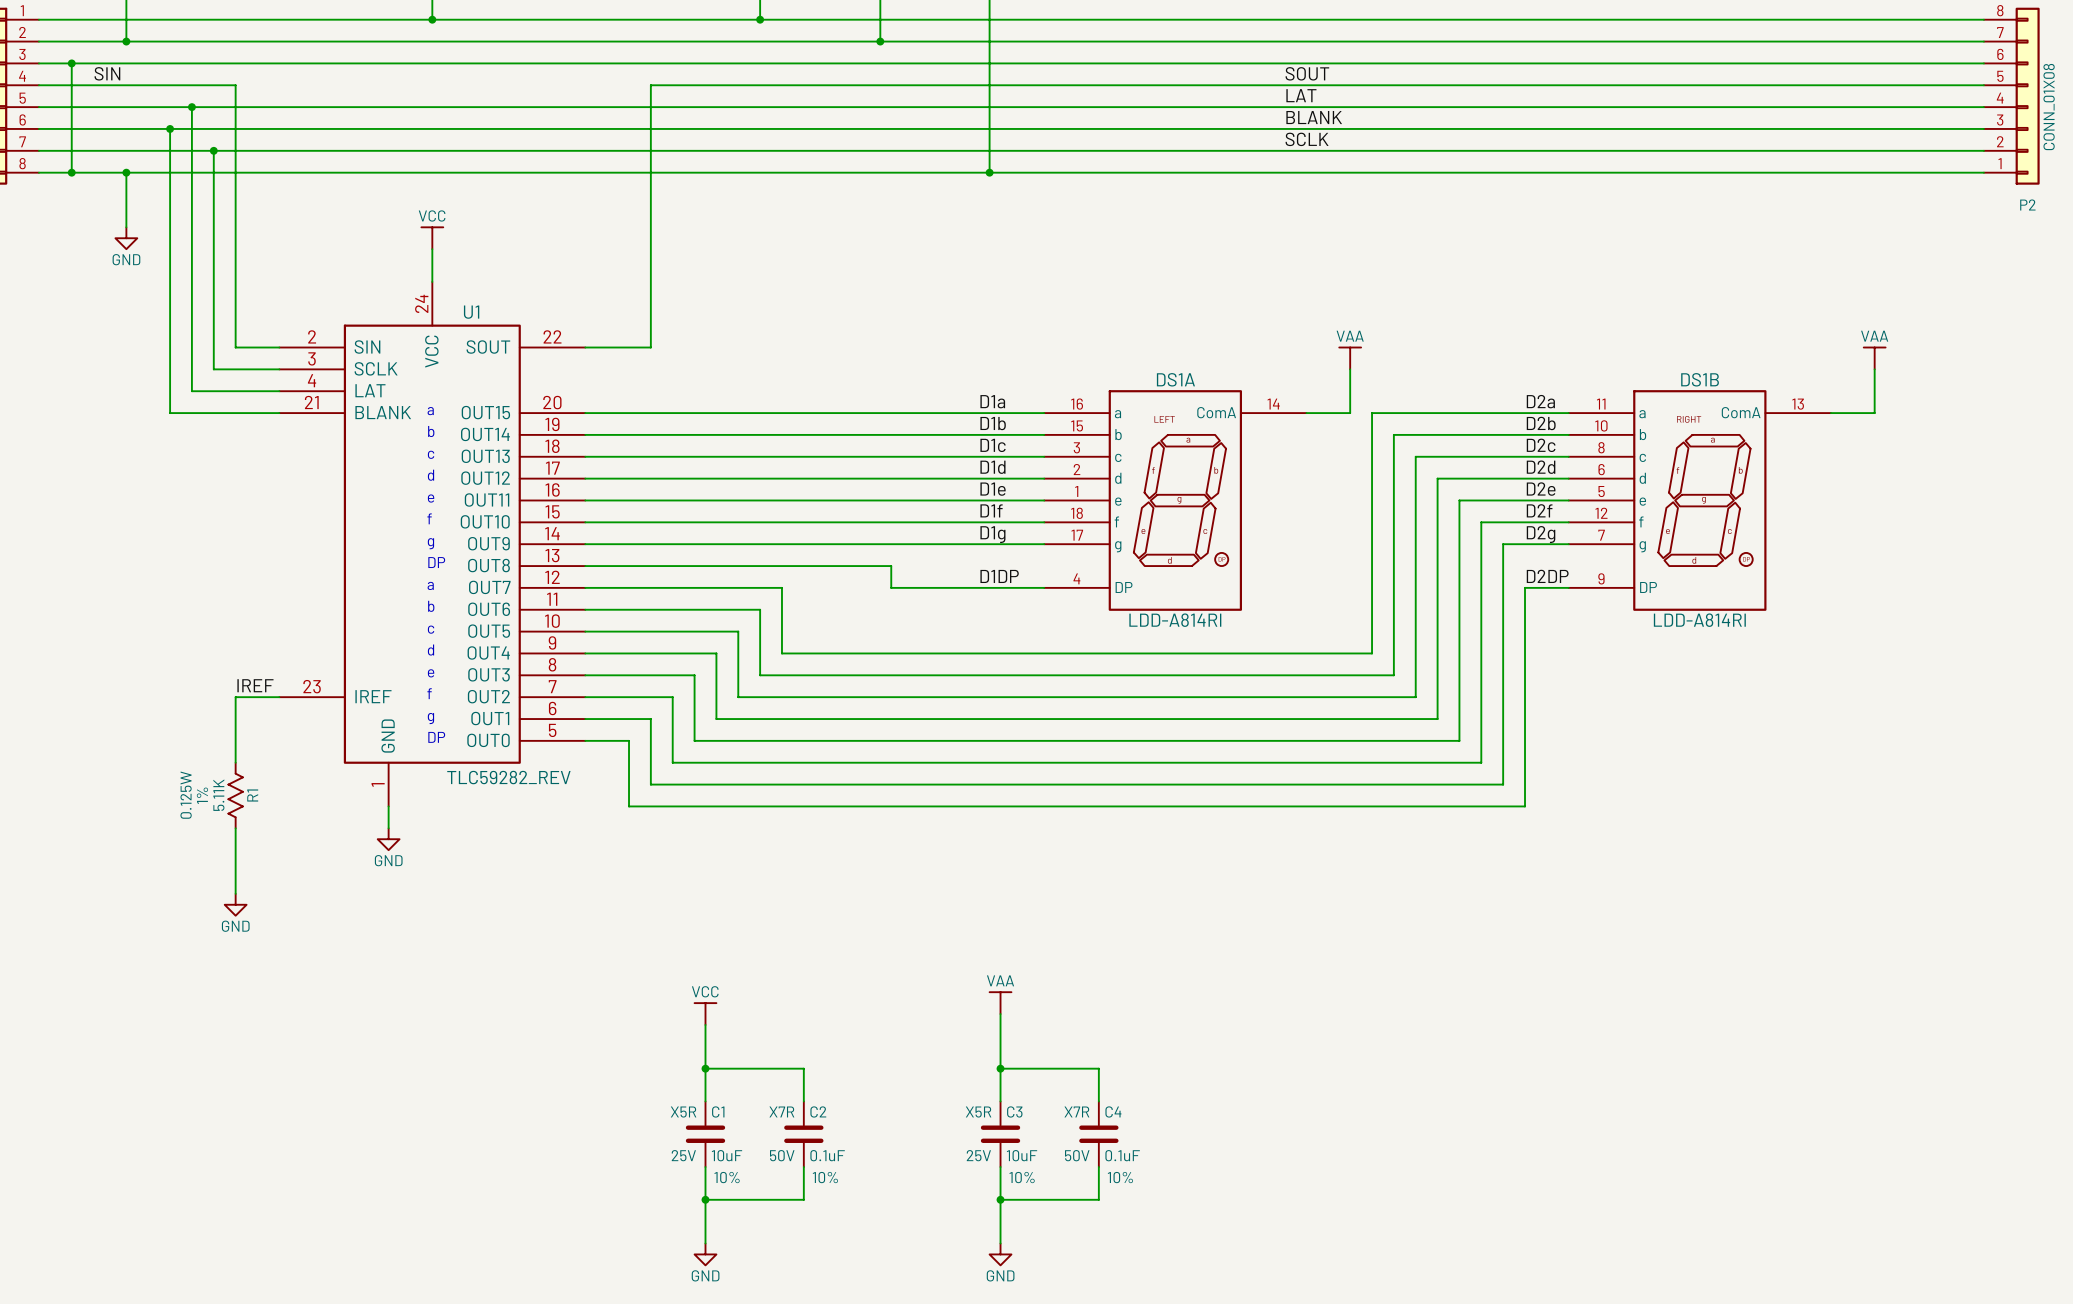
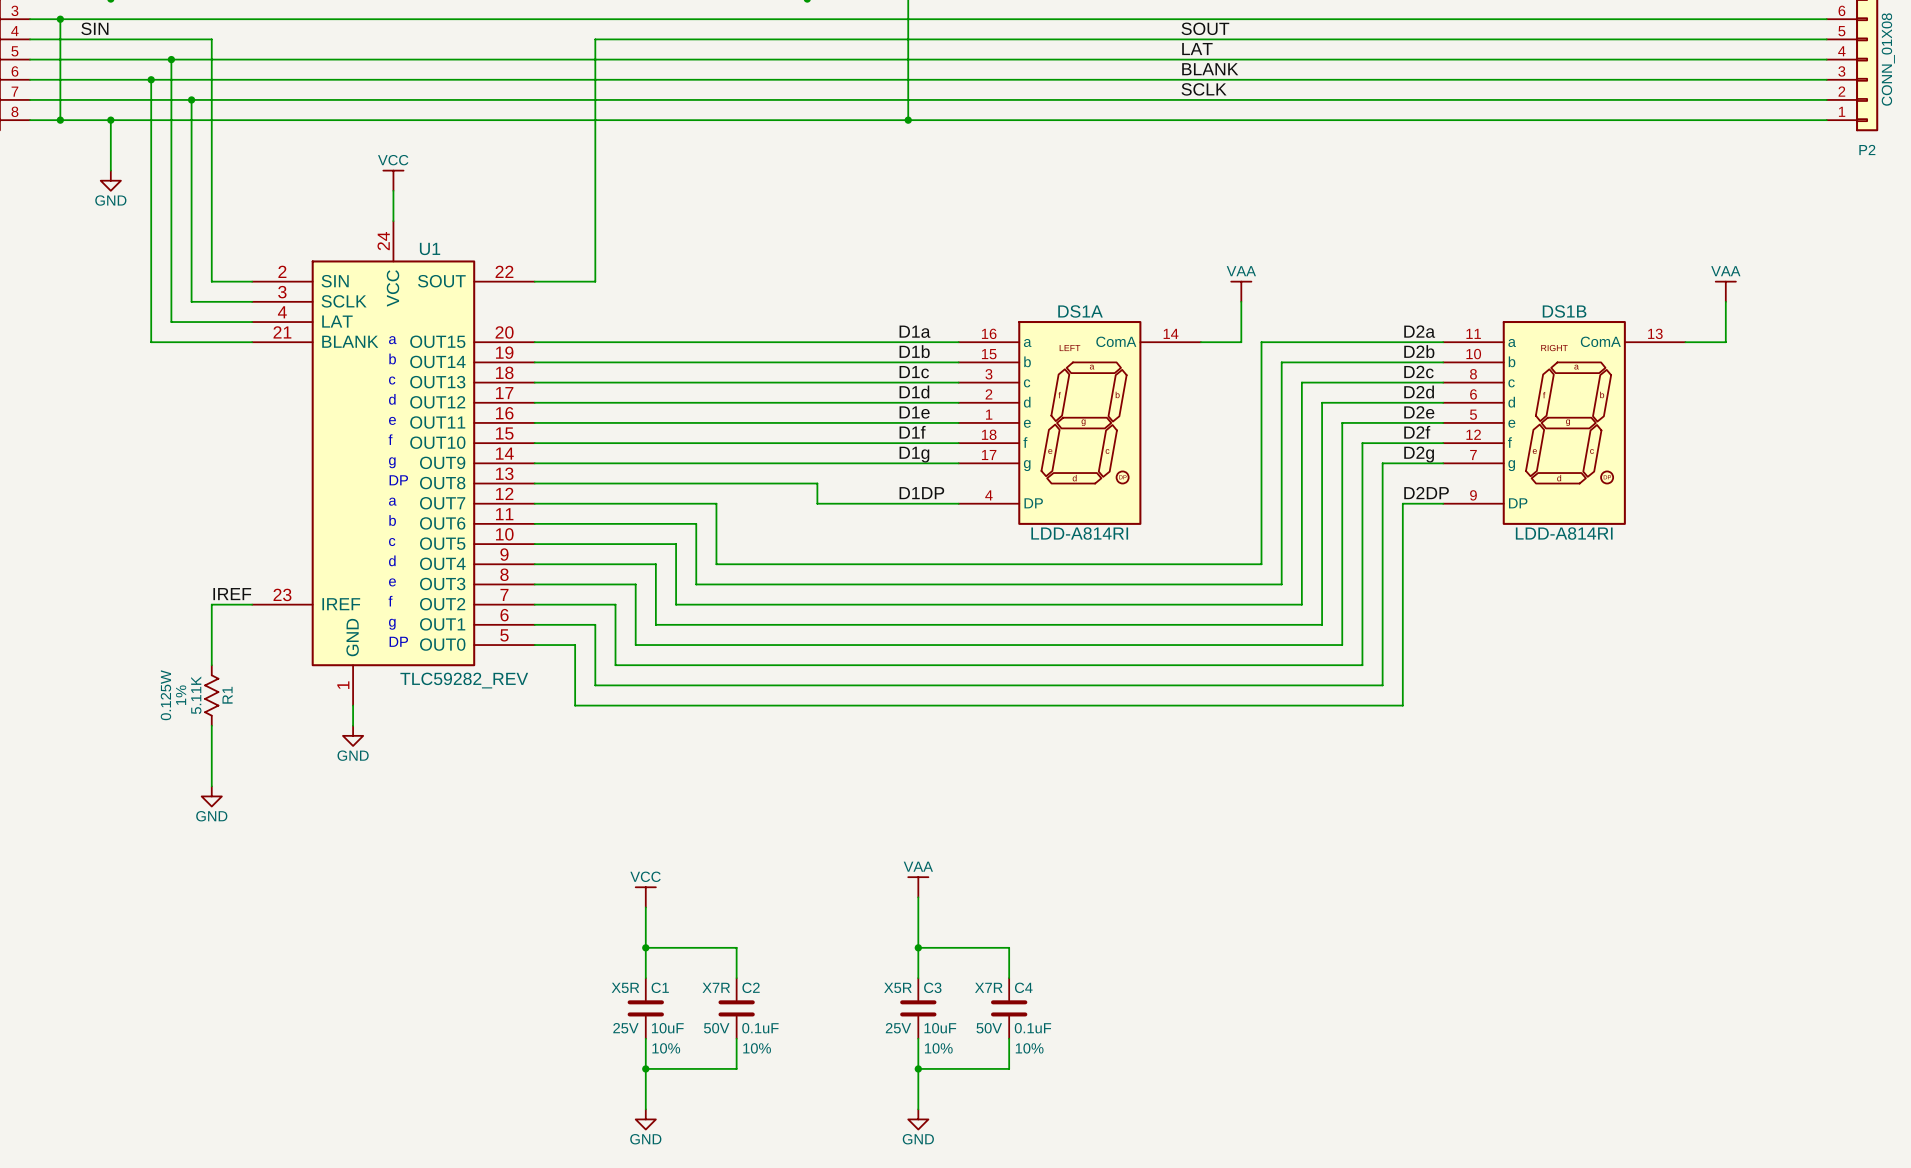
U1 symbol: [279, 281, 586, 807] -> [252, 221, 535, 706]
DS1A symbol: [1044, 390, 1307, 611] -> [958, 321, 1201, 525]
DS1B symbol: [1568, 390, 1831, 611] -> [1443, 321, 1686, 525]

